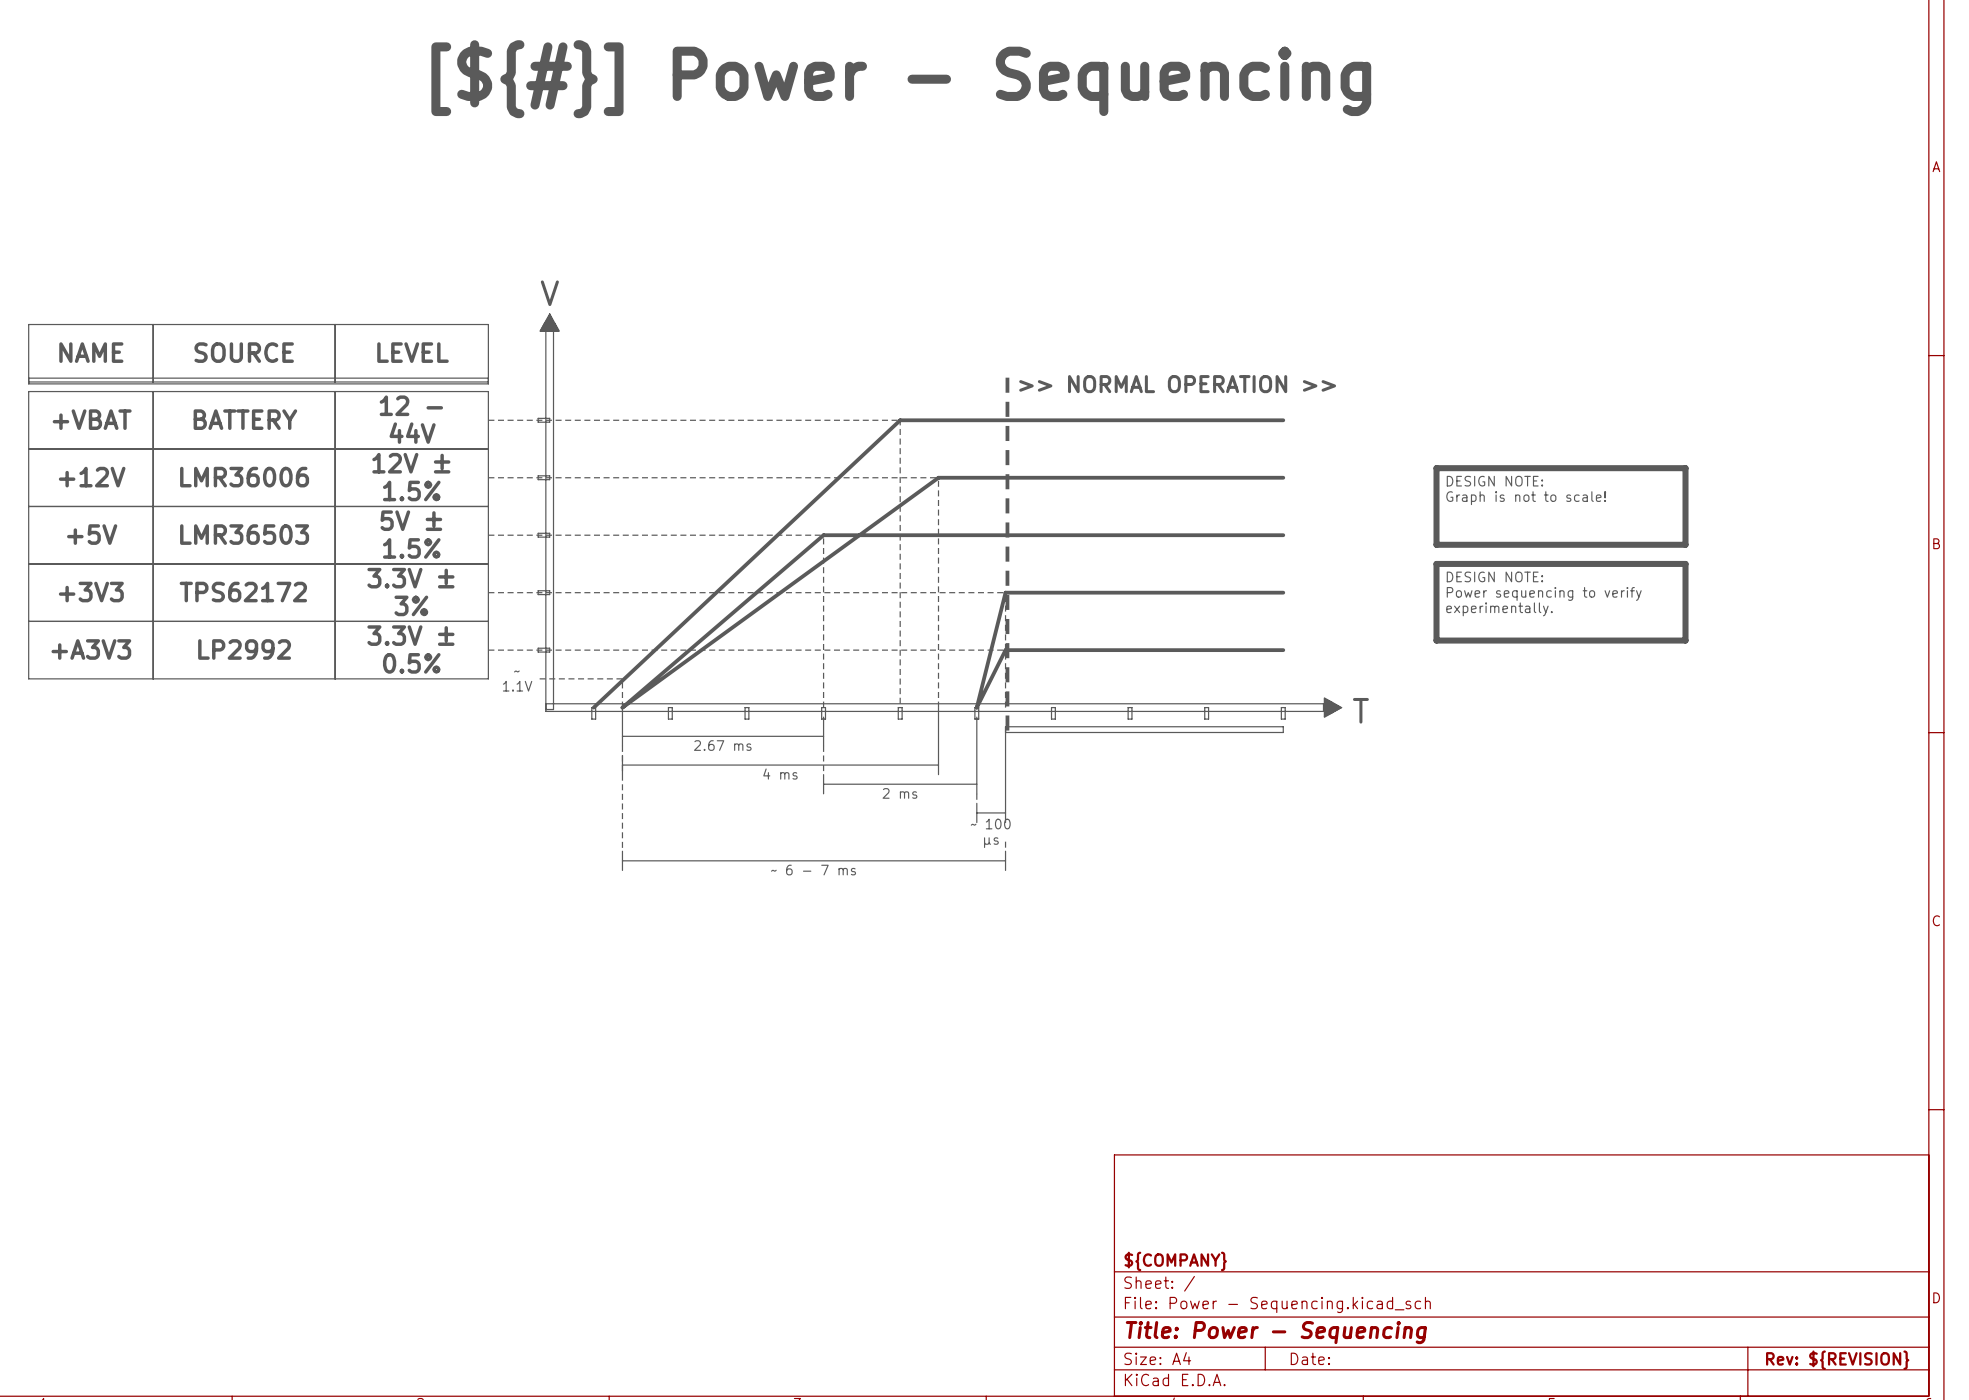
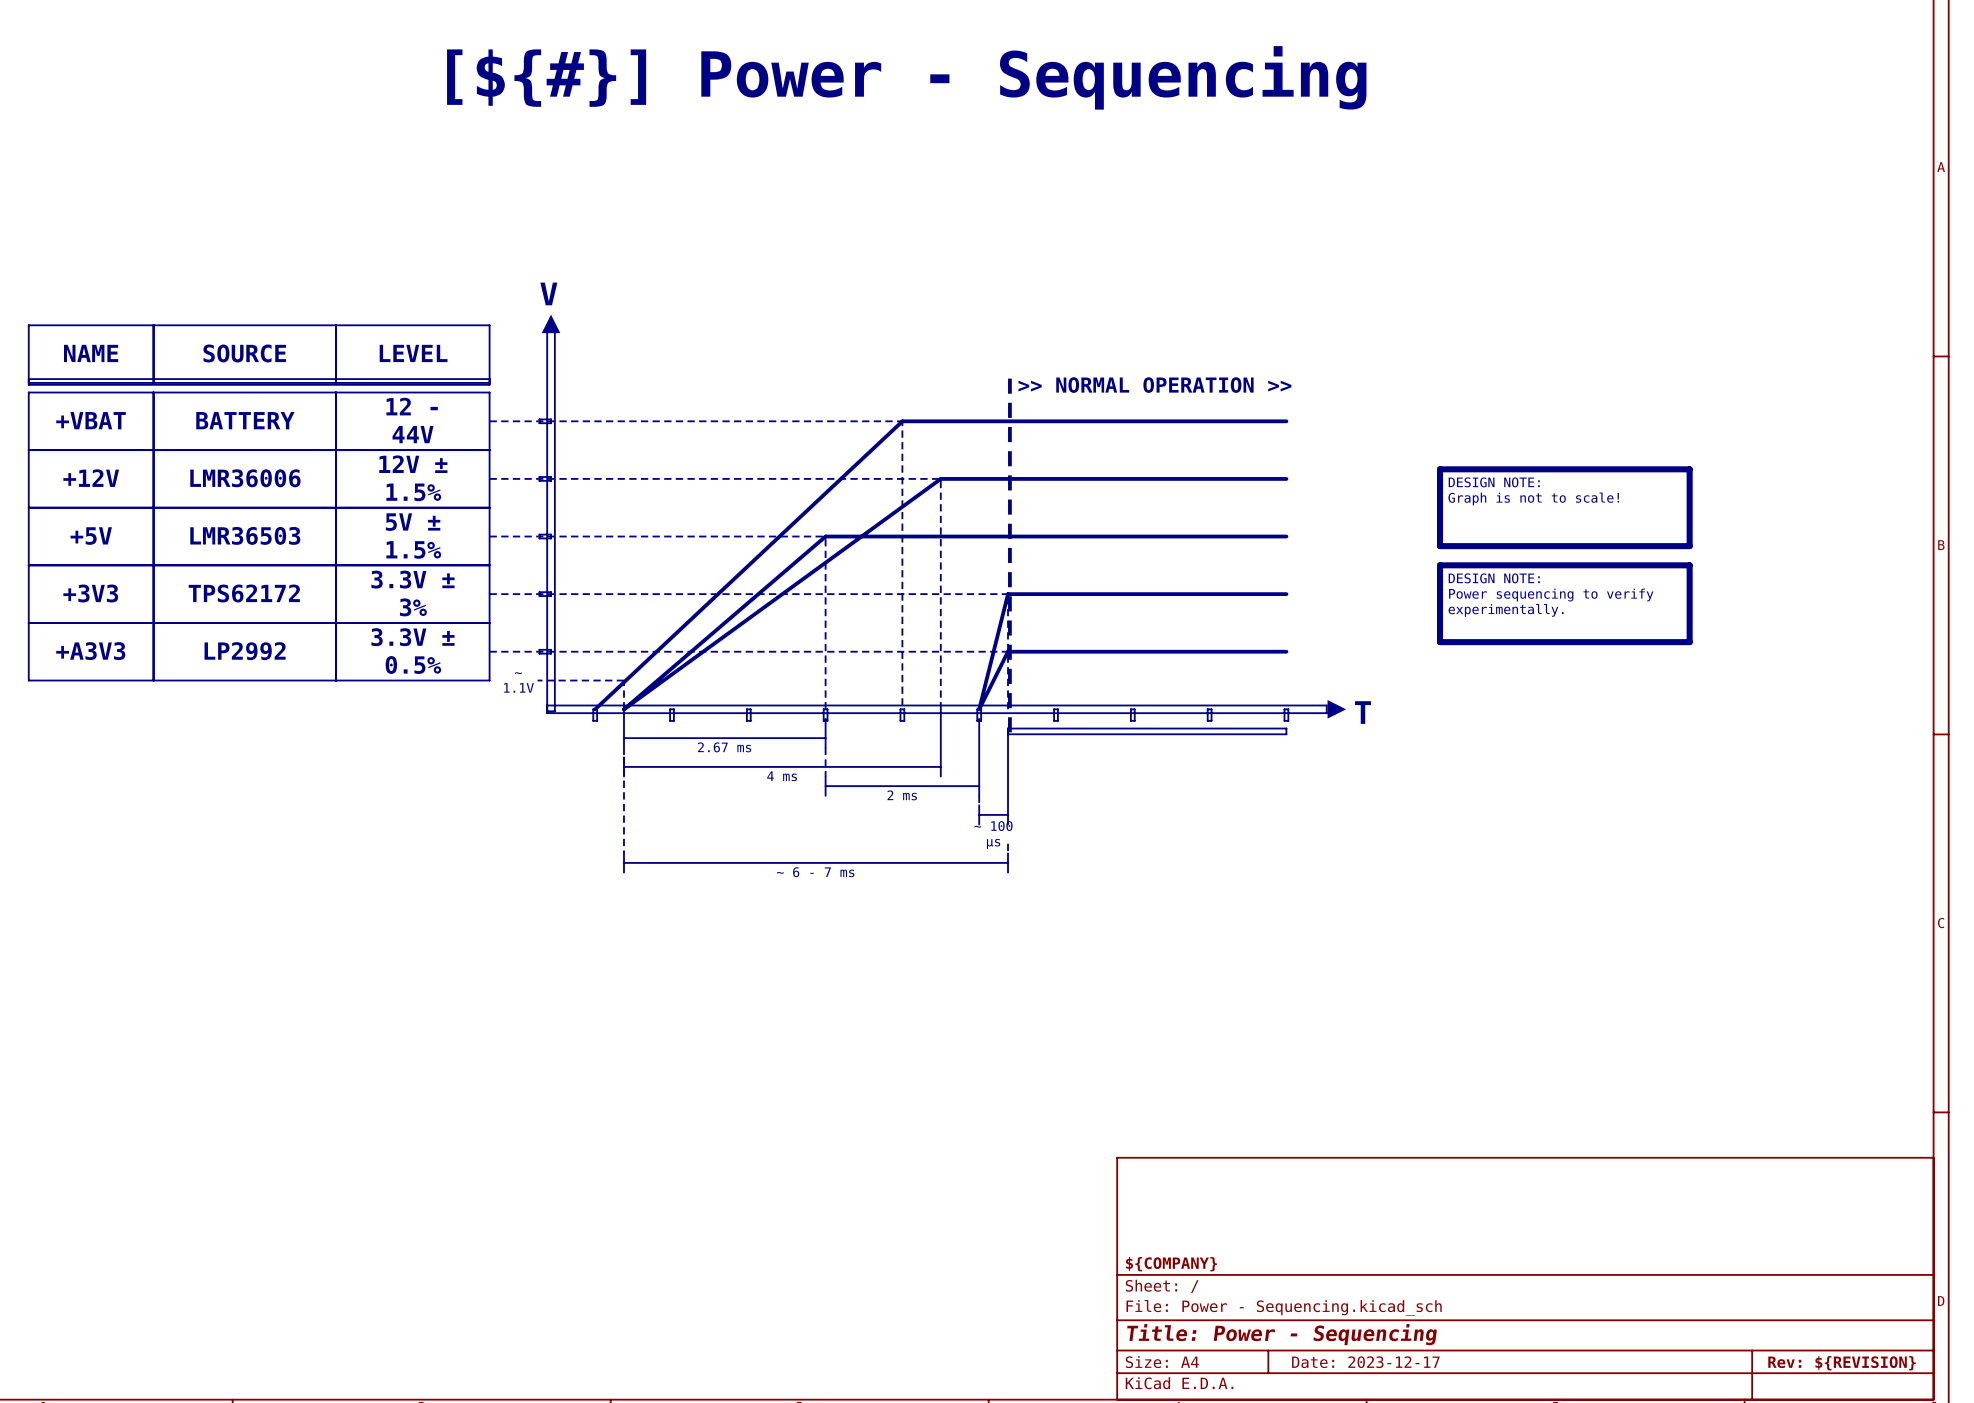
title block: Date: (1310, 1358) -> Date: 2023-12-17 (1365, 1362)

